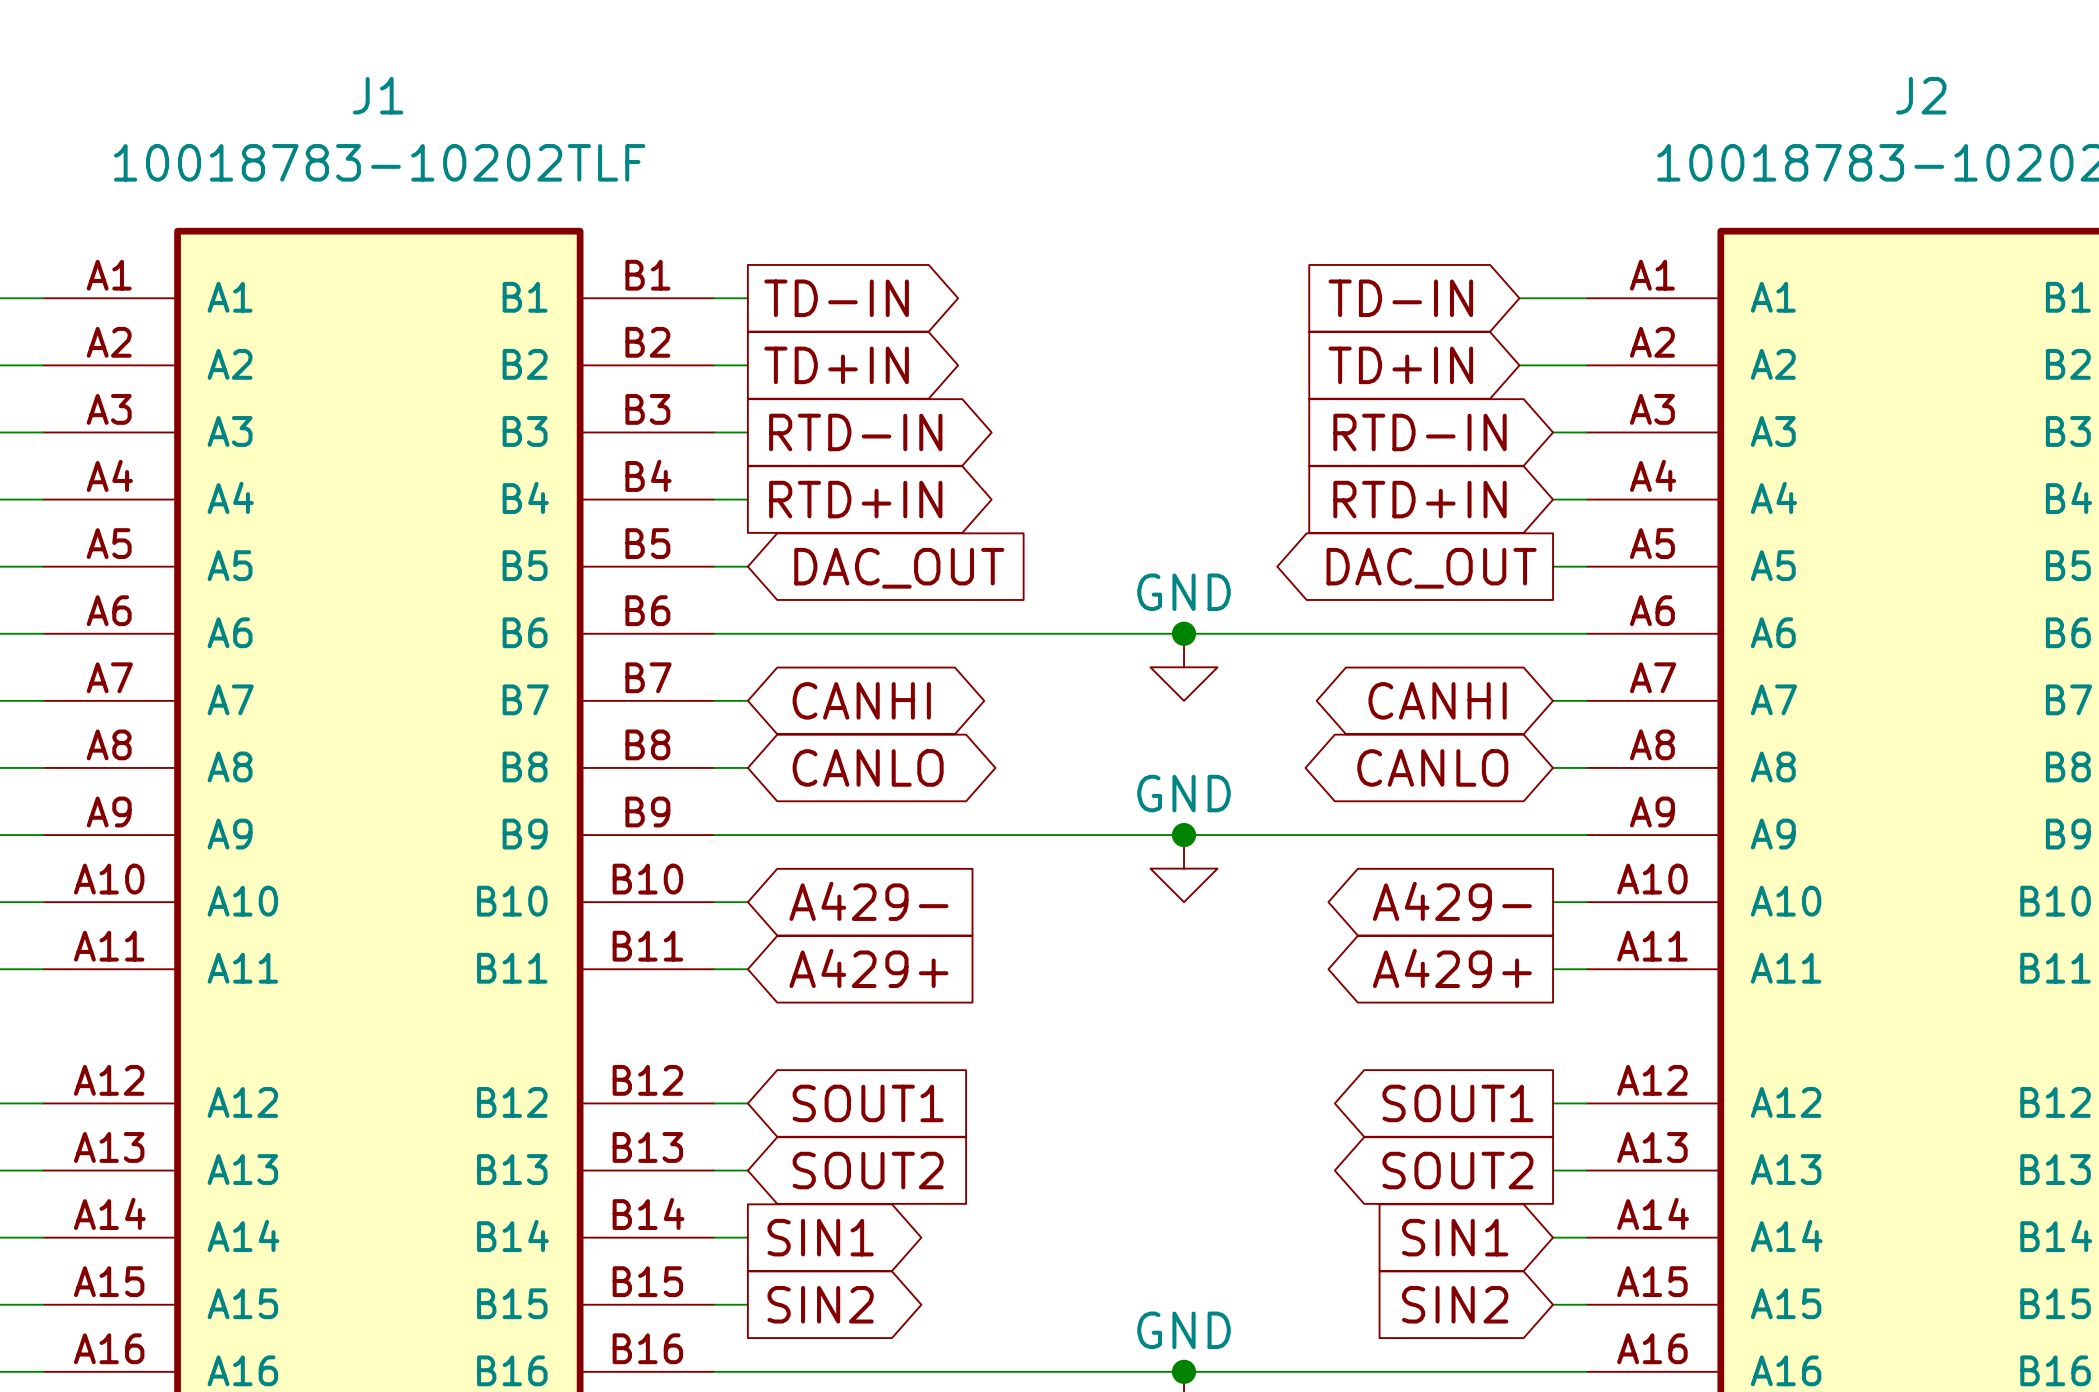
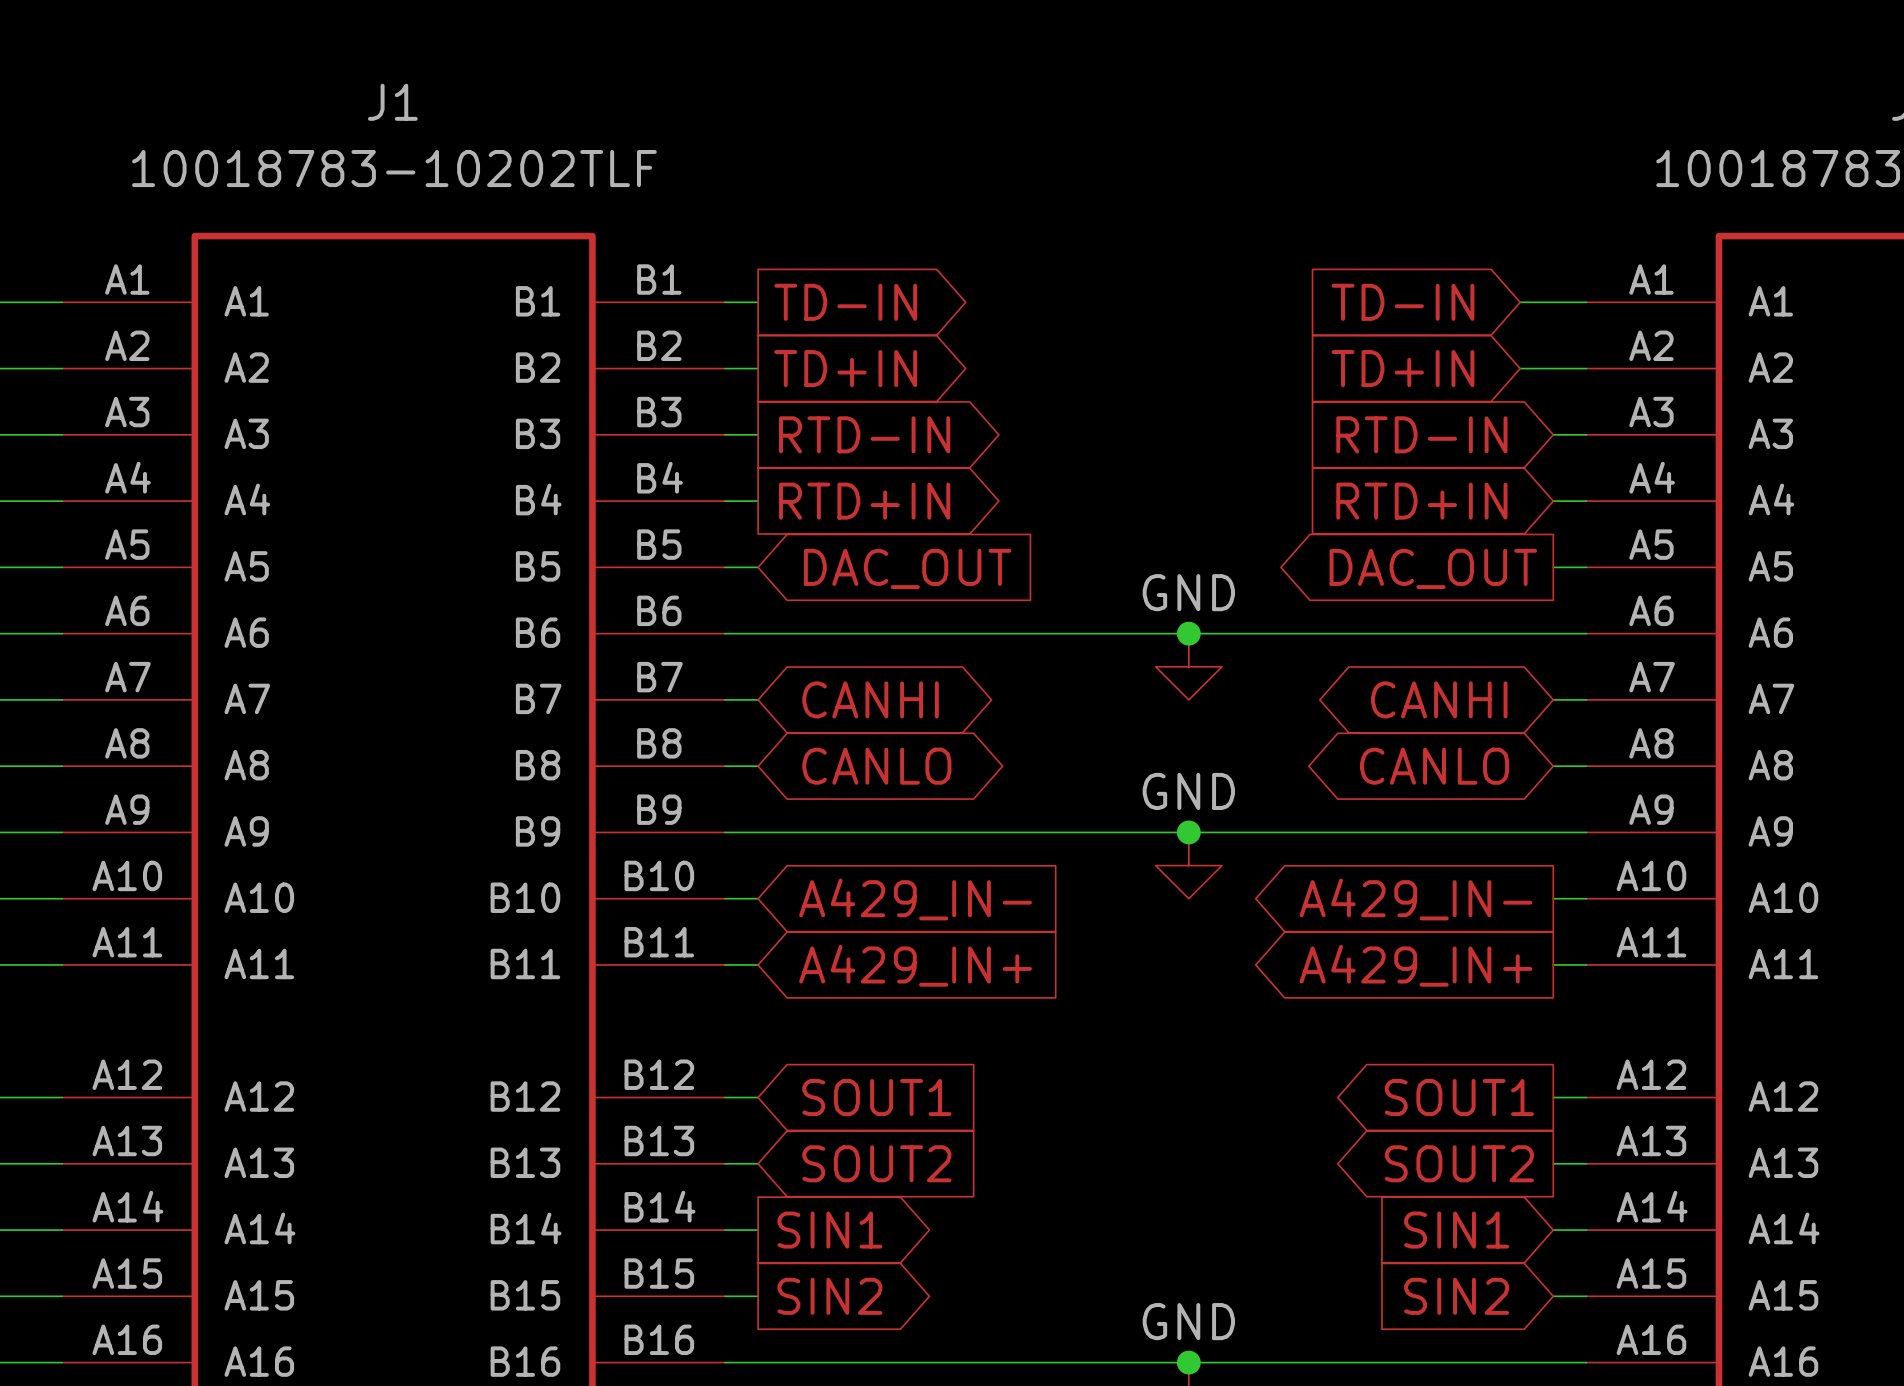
global label: A429- (868, 901) -> A429_IN- (915, 899)
global label: A429- (1452, 901) -> A429_IN- (1415, 899)
global label: A429+ (868, 968) -> A429_IN+ (915, 965)
global label: A429+ (1452, 968) -> A429_IN+ (1415, 965)

